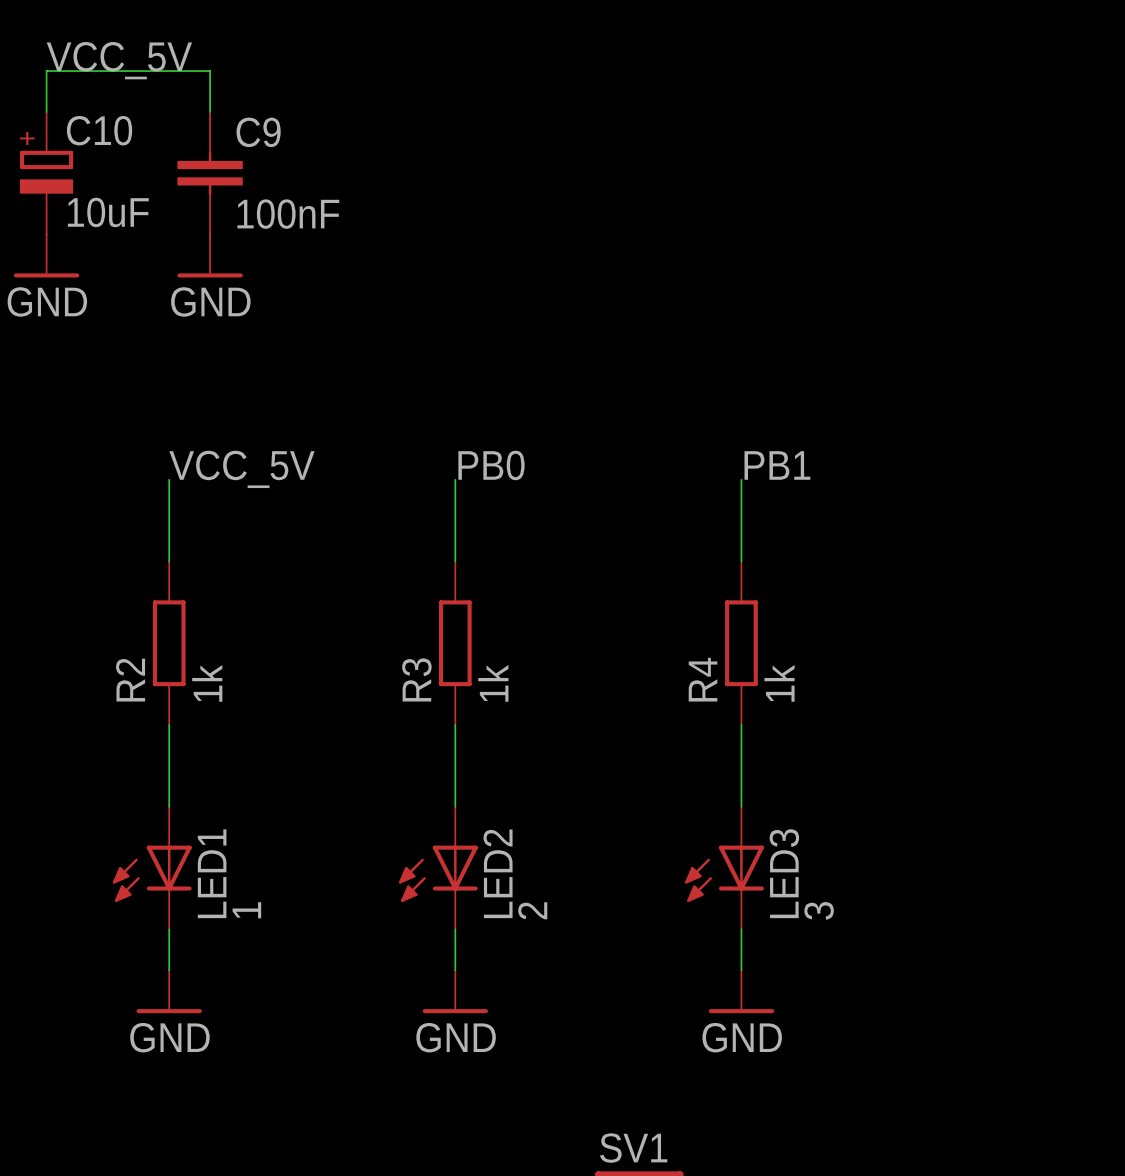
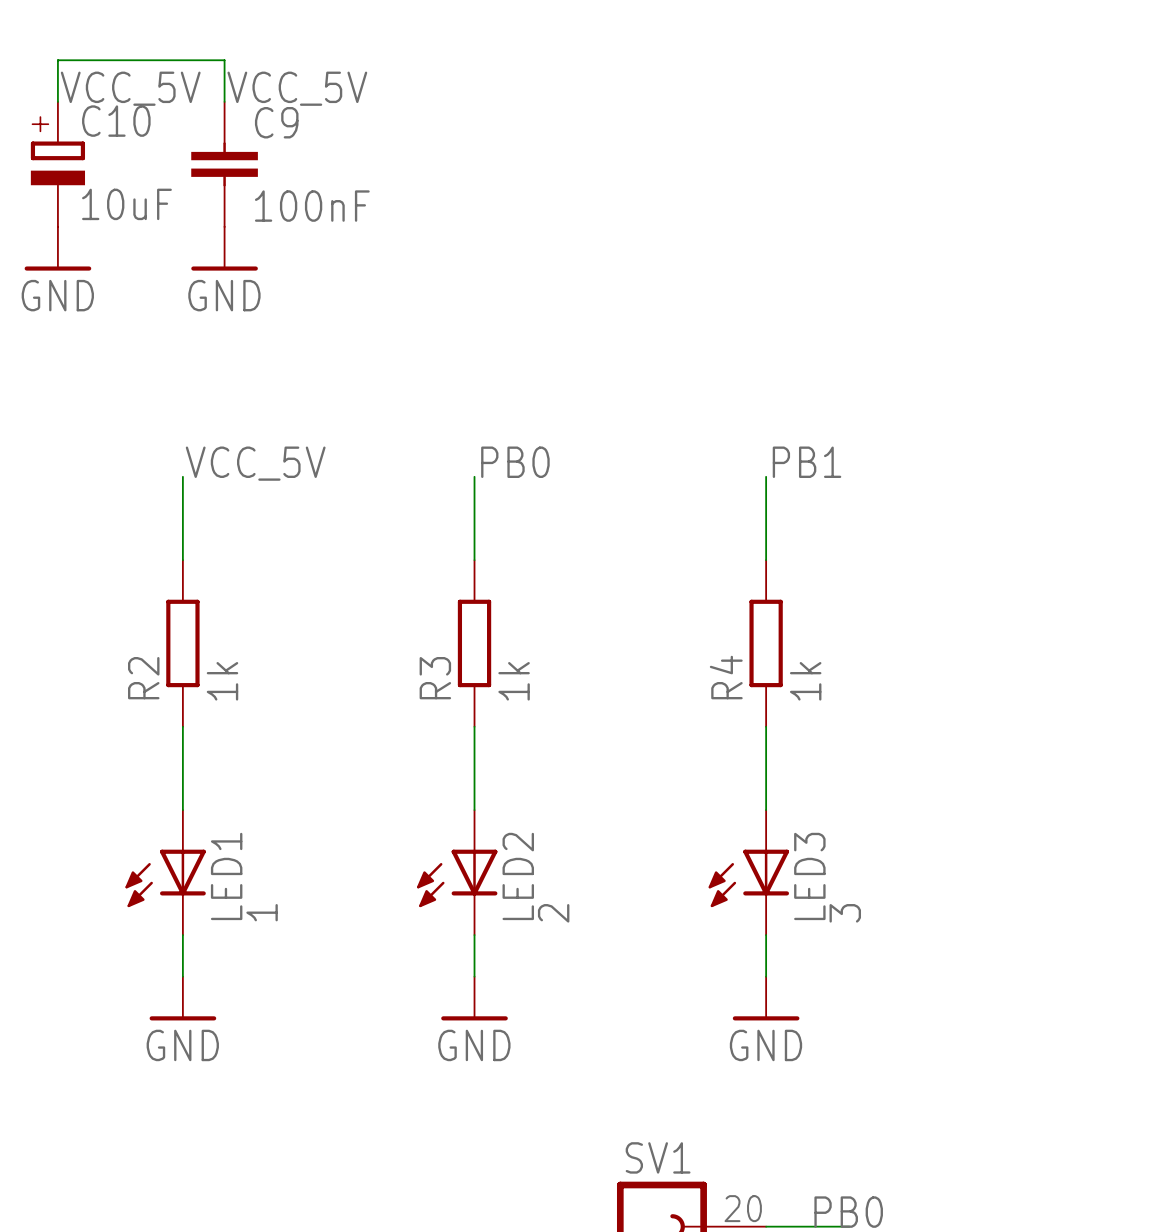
label position: VCC_5V (119, 60) -> VCC_5V (130, 88)
label: none -> VCC_5V (297, 88)

